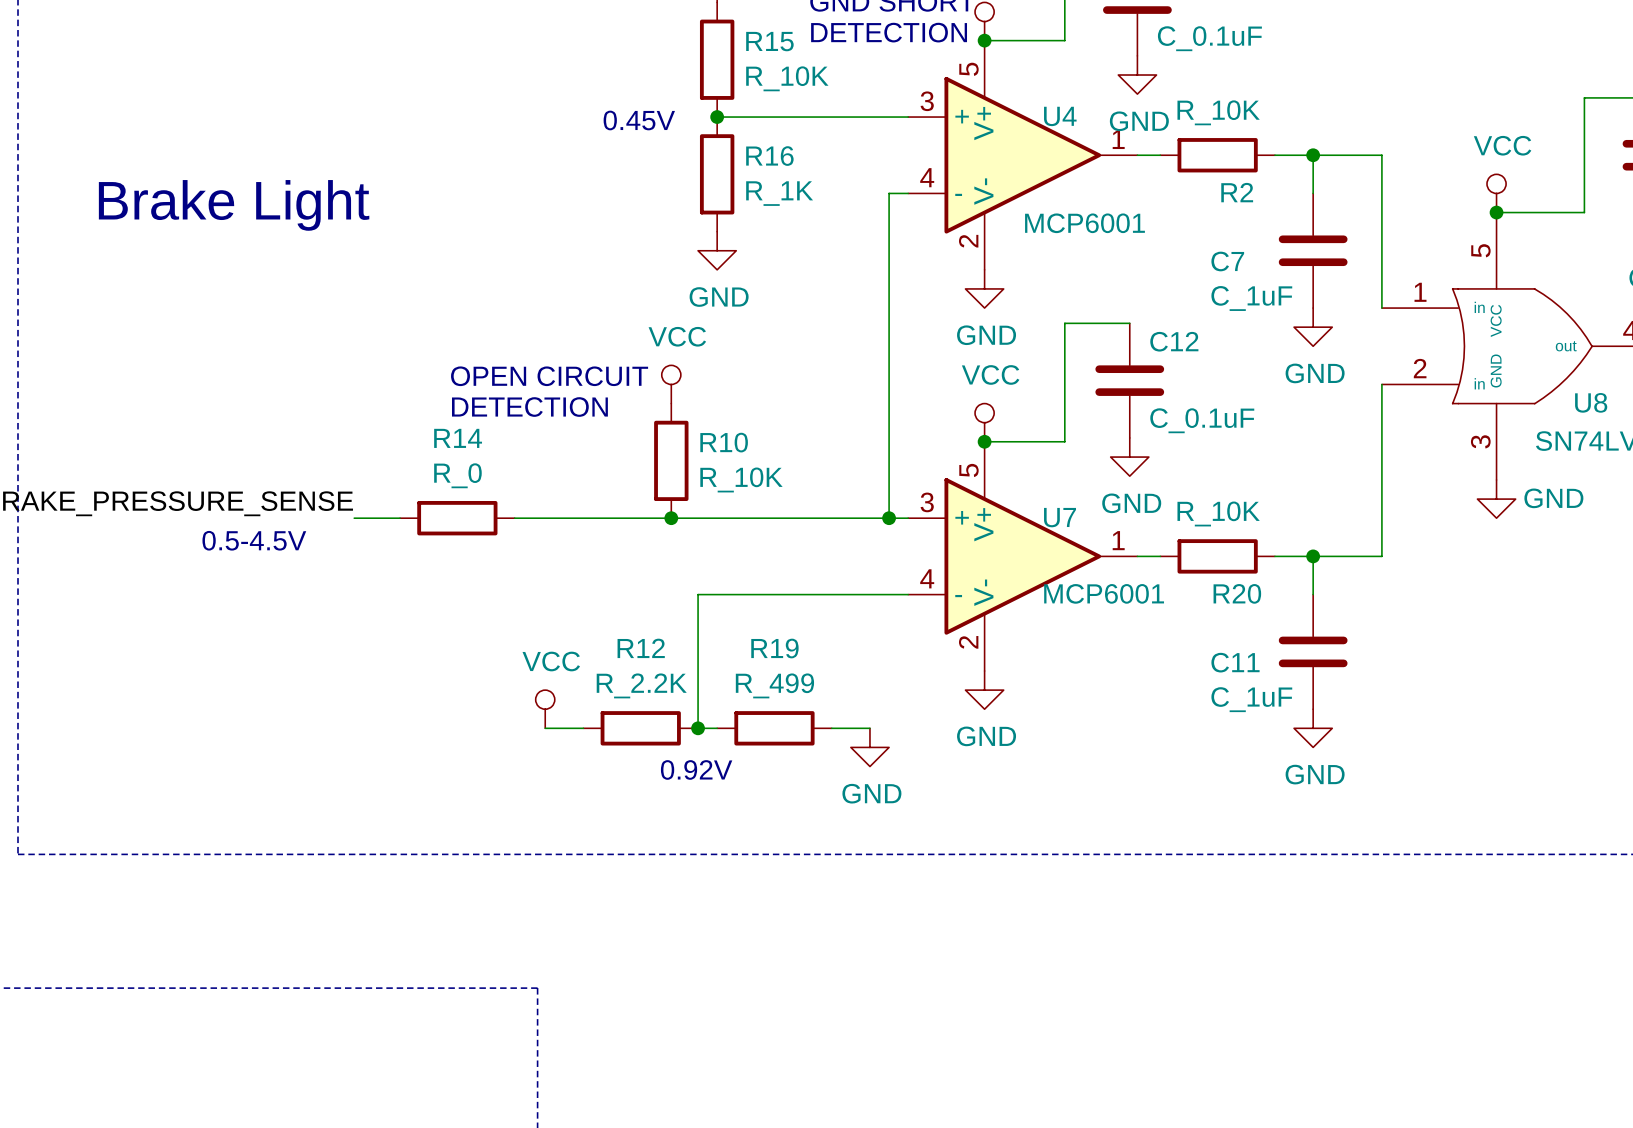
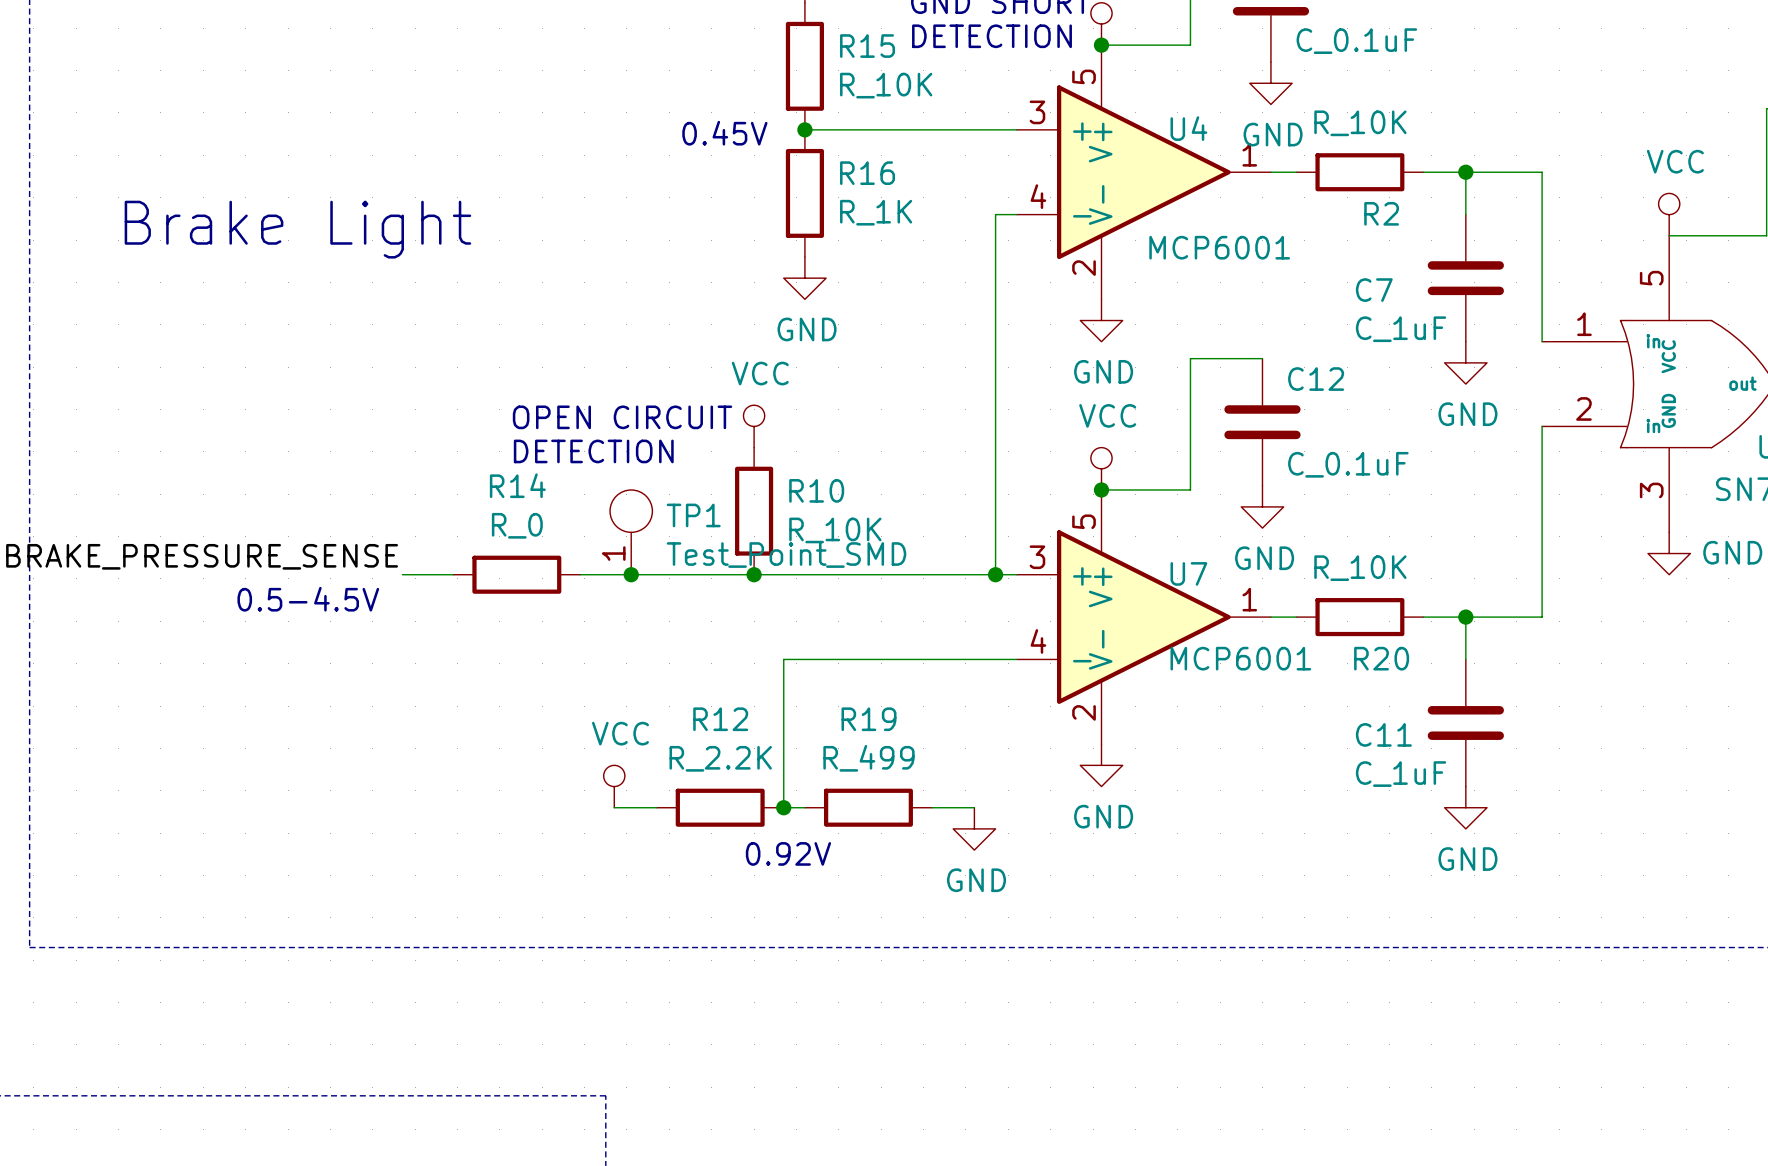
junction: (1496, 212) -> none
TP1: none -> Test_Point_SMD (631, 532)
junction: none -> (631, 574)

